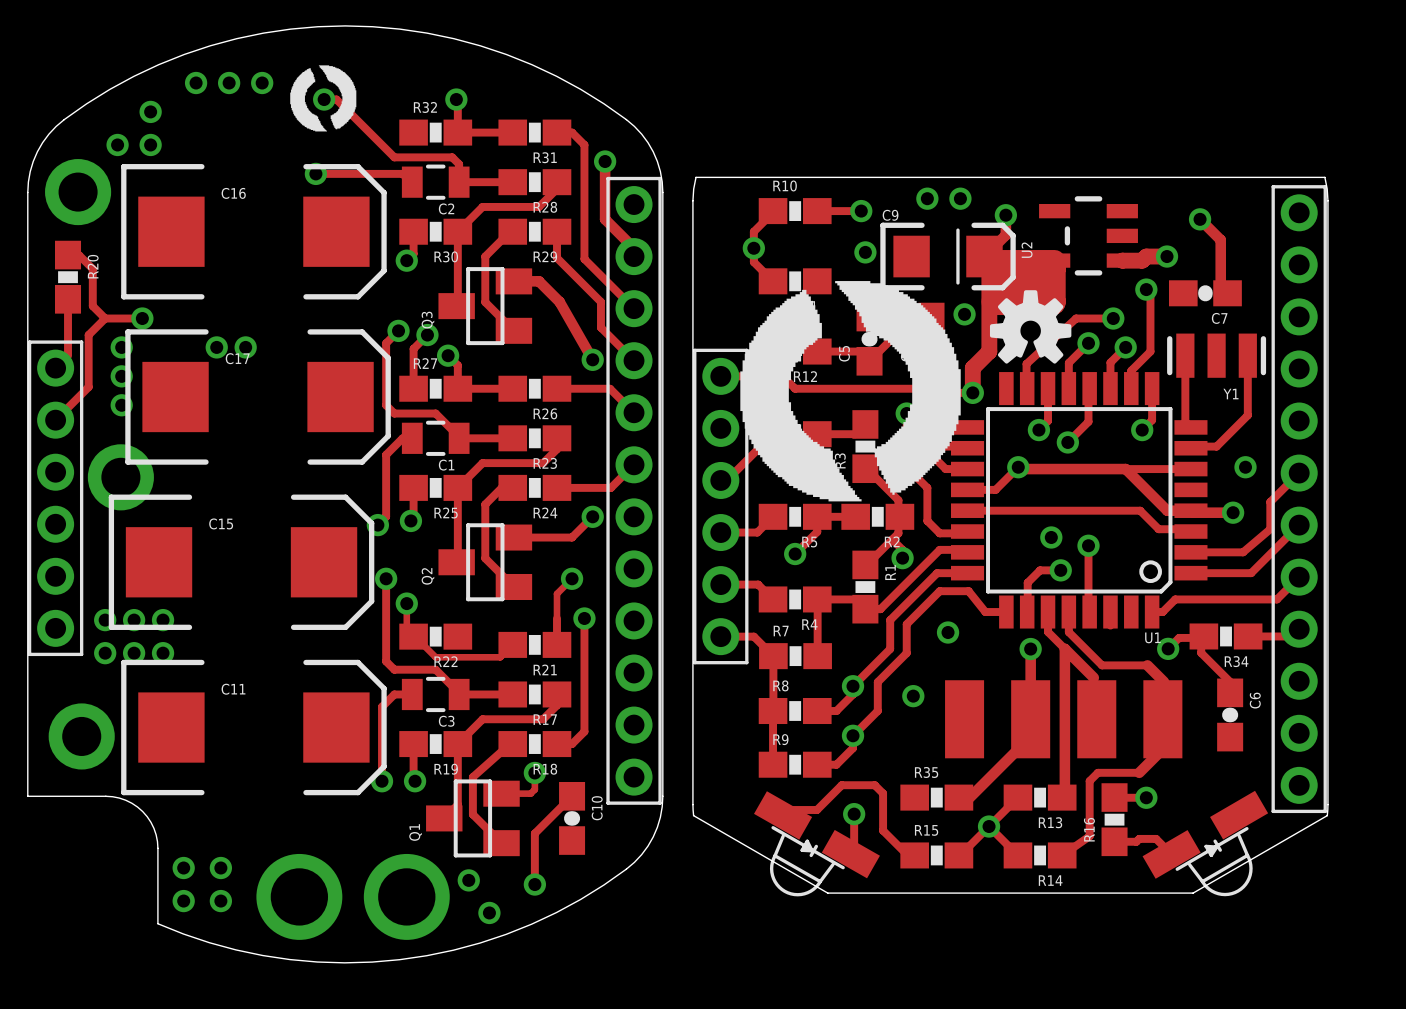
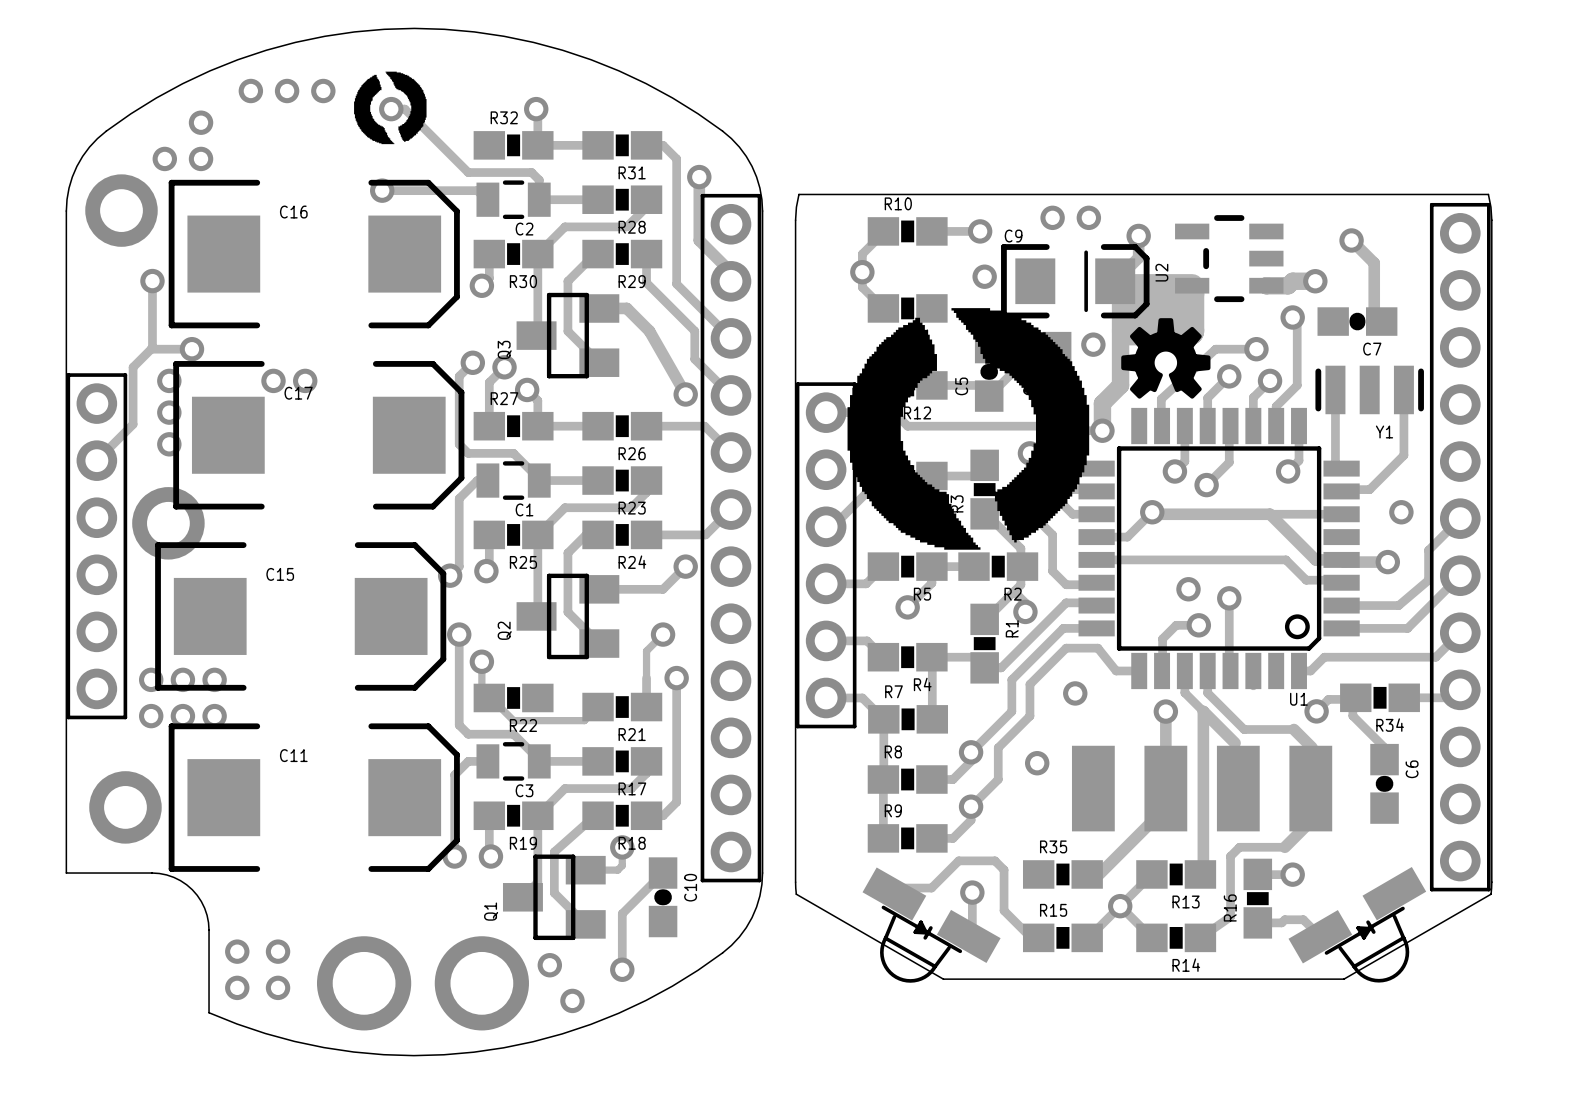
track: (68, 255) (78, 255) (92, 268) (92, 306) (105, 318) -> (152, 281) (151, 349)
via: none -> (152, 281)
R20: (68, 277) -> none
track: (68, 299) (68, 355) (55, 368) -> none

